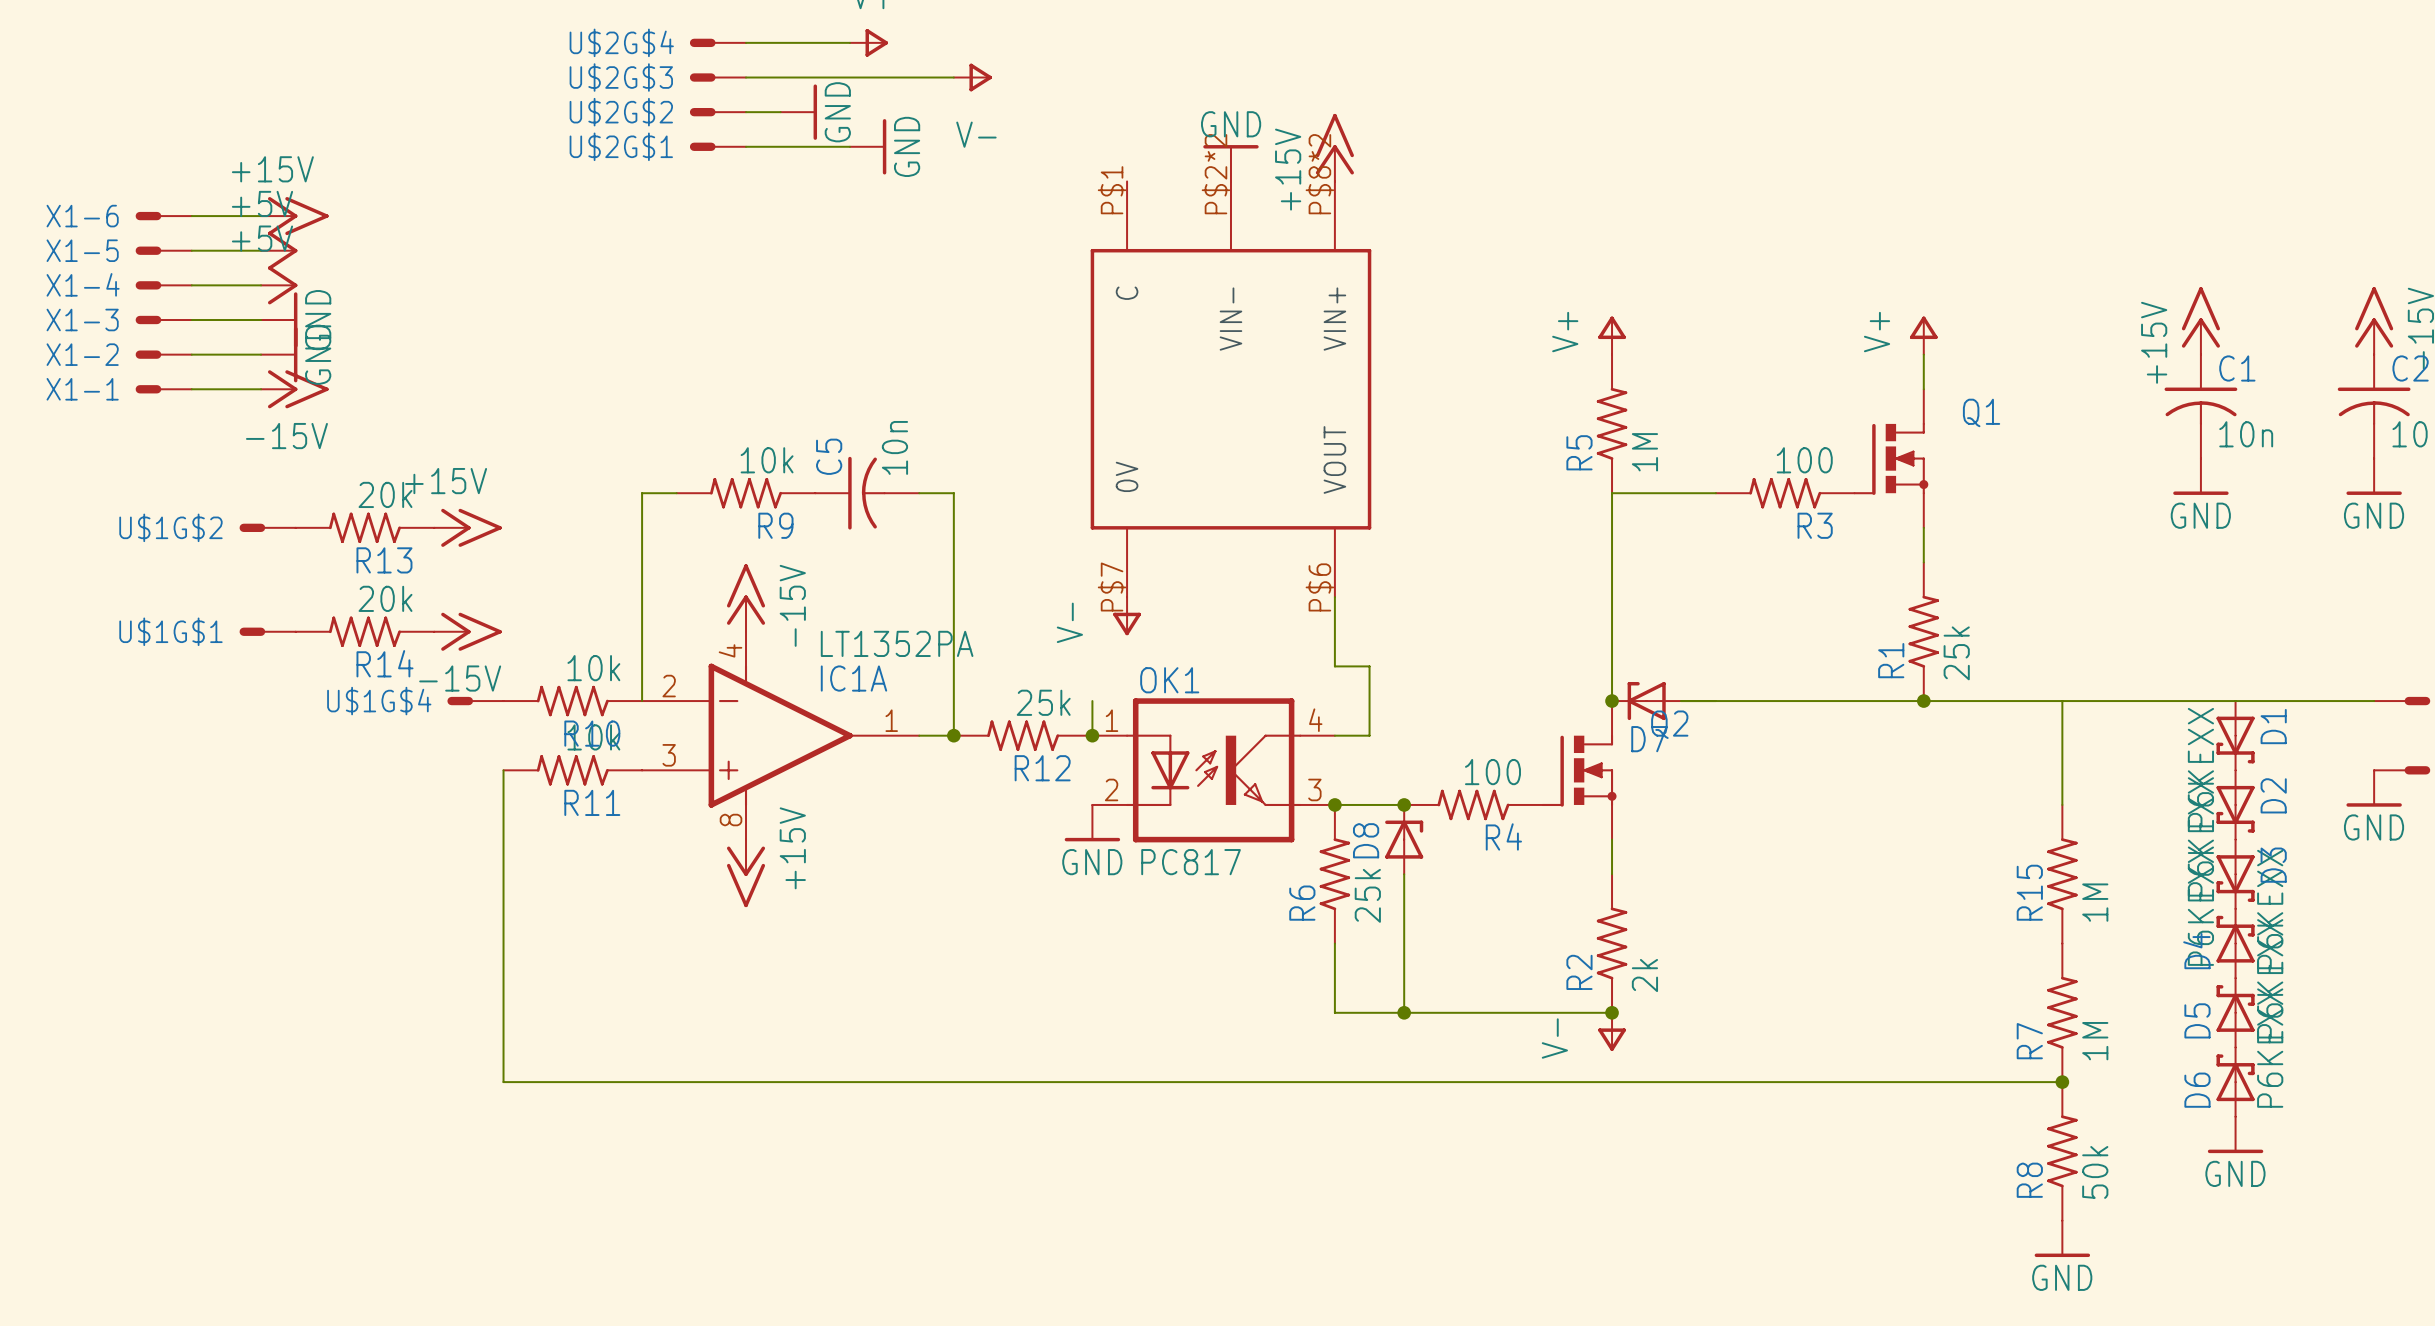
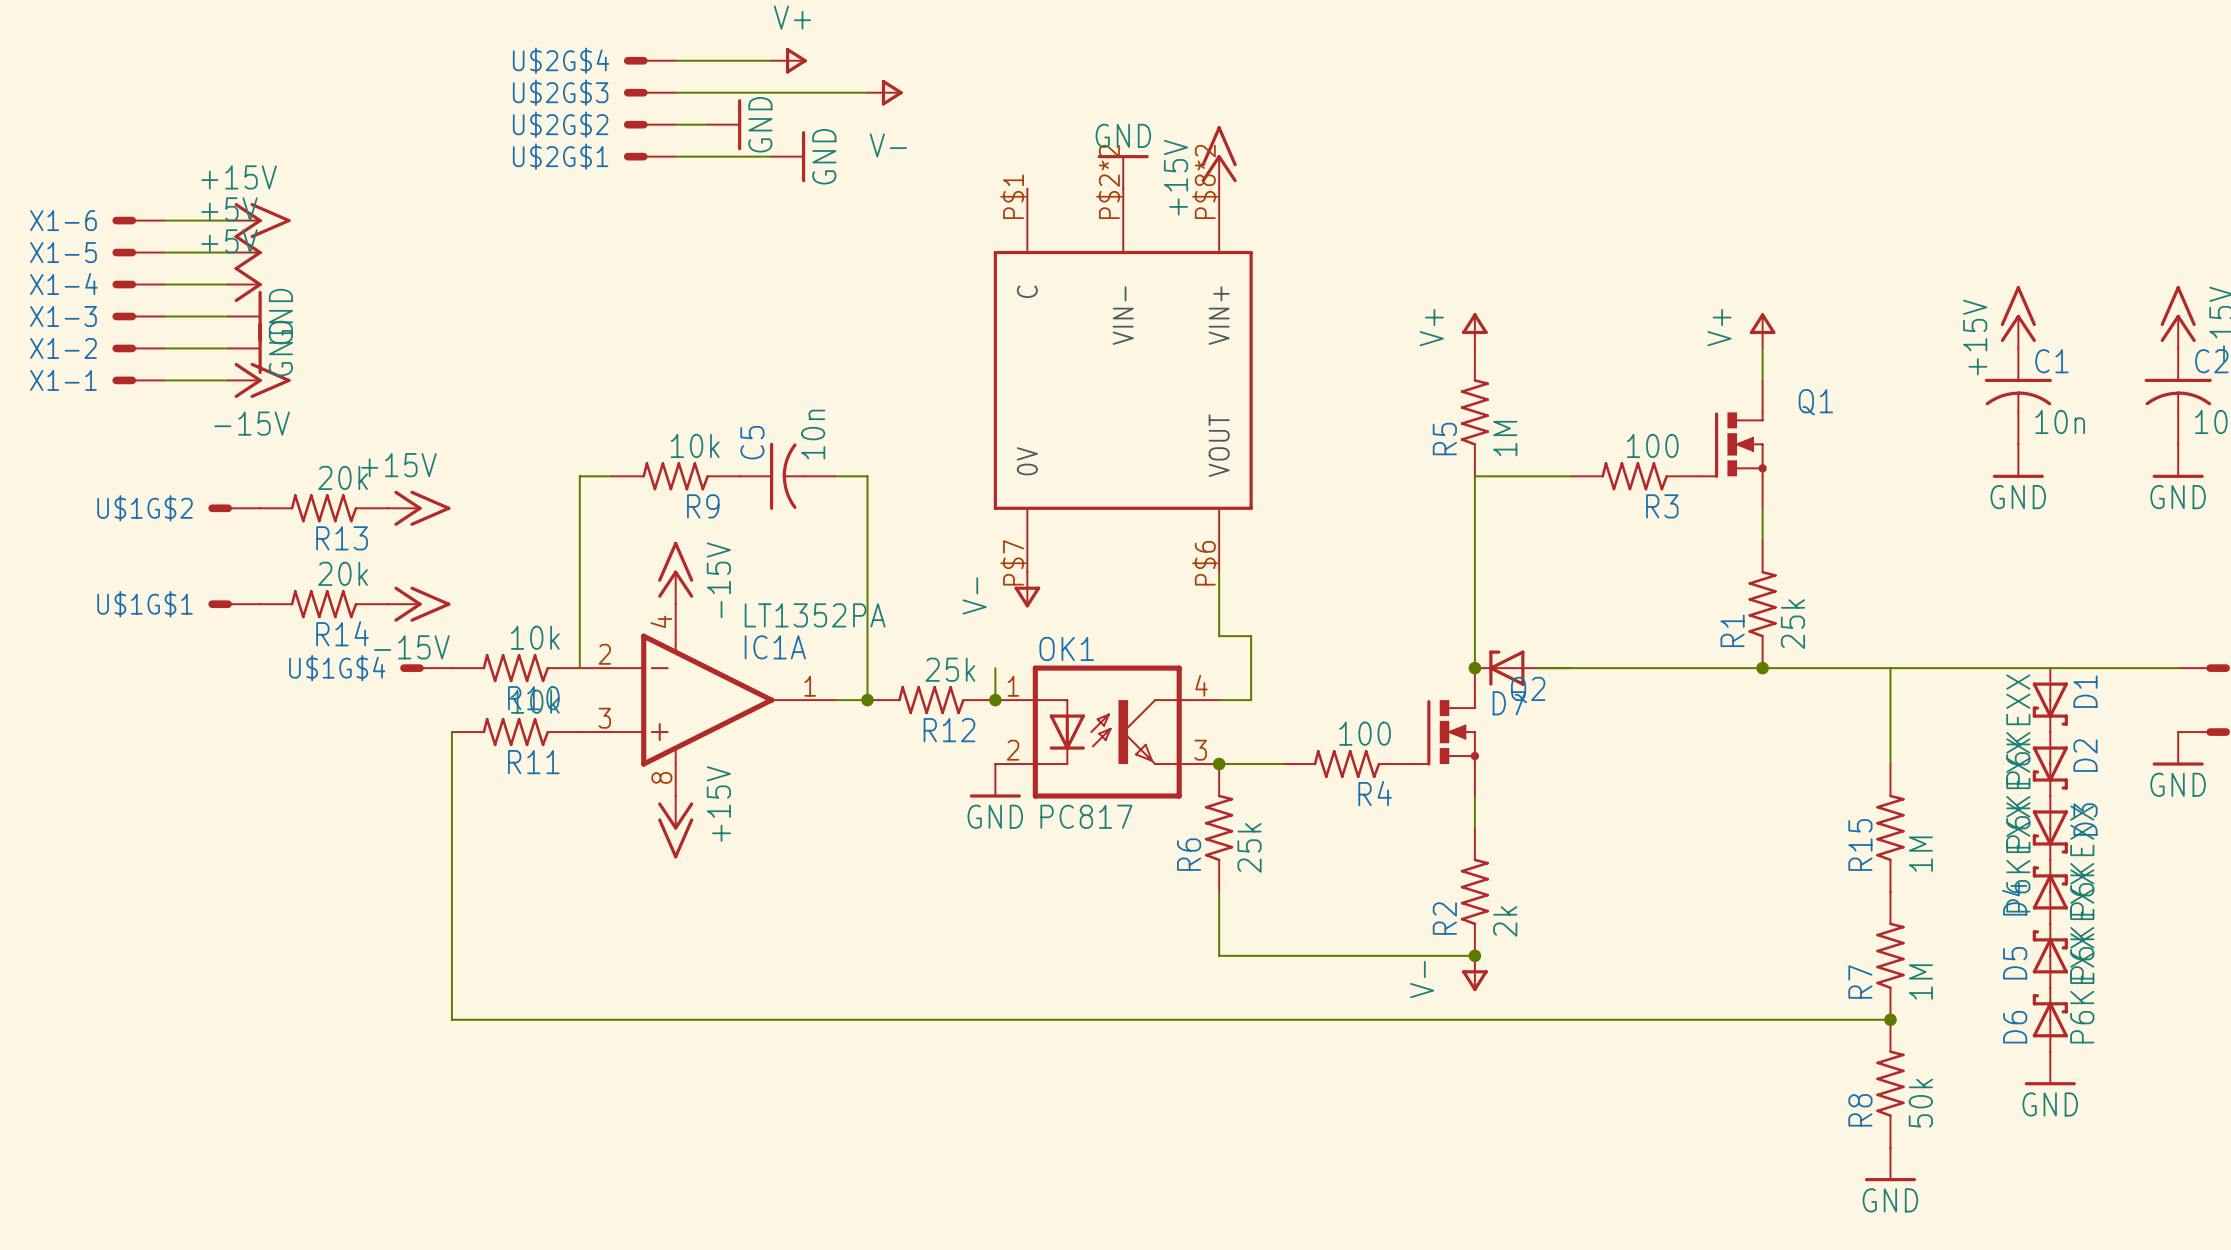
junction: (1404, 804) -> none
D8: (1404, 839) -> none
wire: (1404, 874) (1404, 1012) -> none
junction: (1404, 1012) -> none

